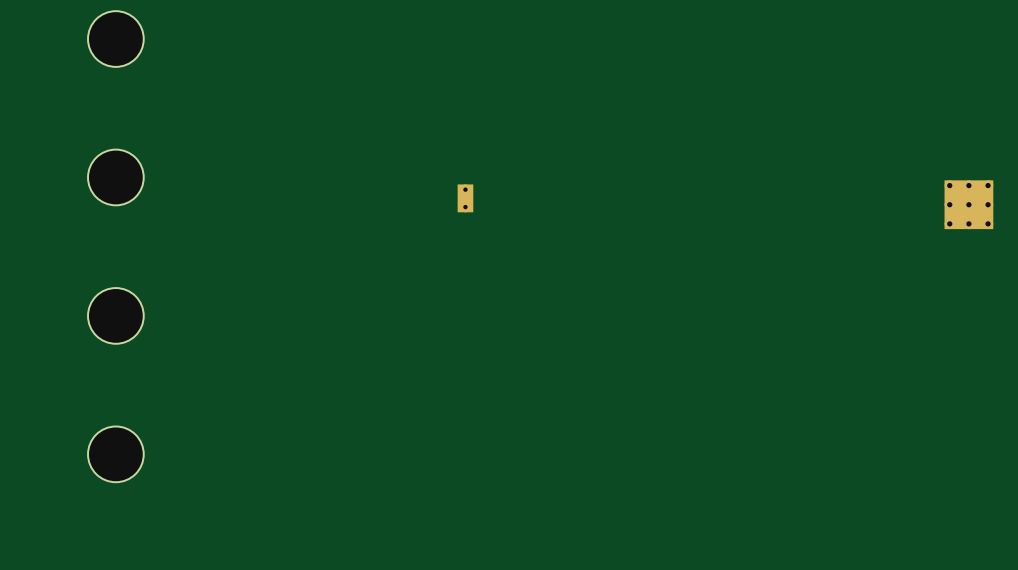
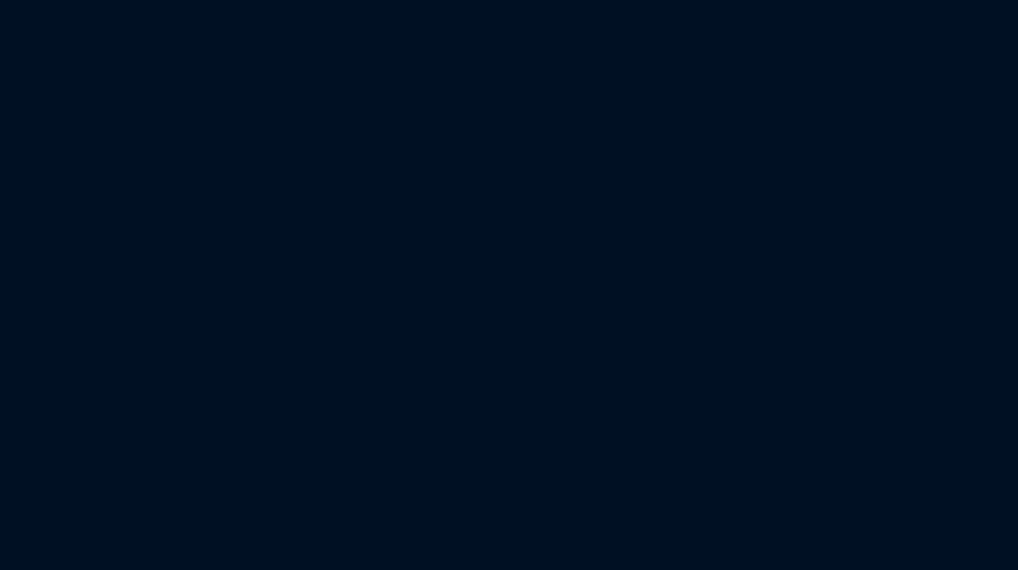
part: (115, 39) -> none
part: (115, 177) -> none
part: (465, 198) -> none
part: (968, 204) -> none
part: (115, 315) -> none
part: (115, 454) -> none

